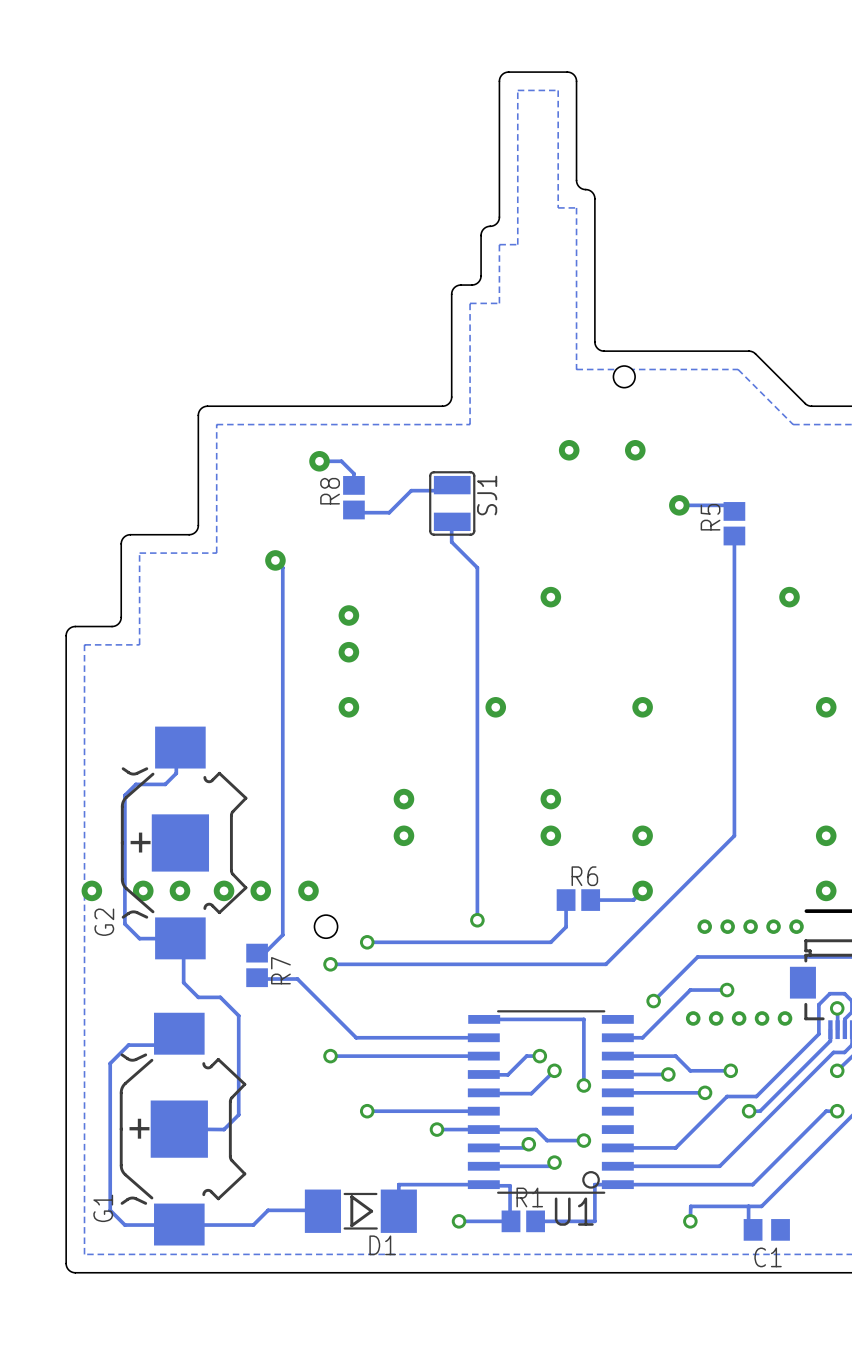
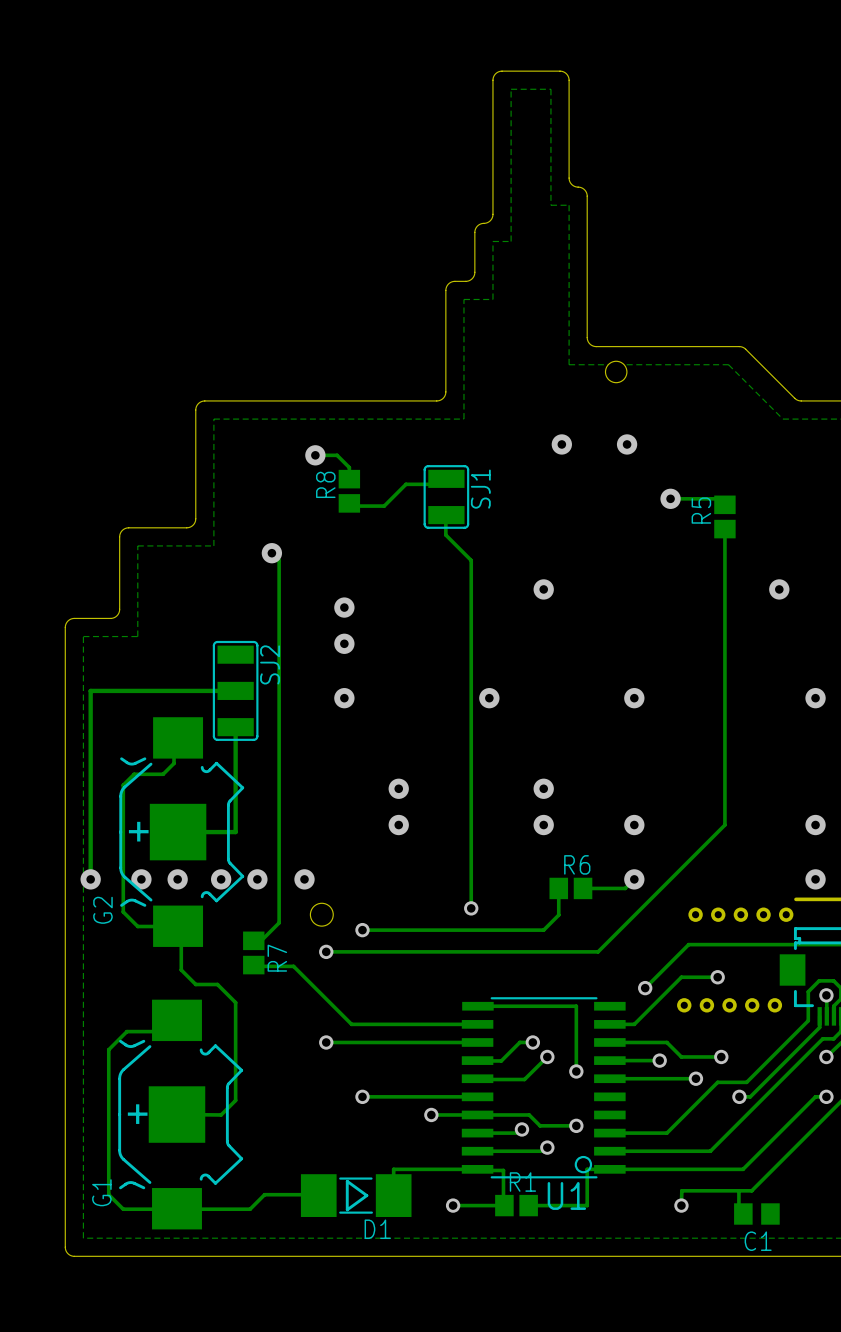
track: none -> (235, 690) (90, 690) (90, 879)
SJ2: none -> (235, 690)
track: none -> (235, 727) (235, 832) (178, 832)

